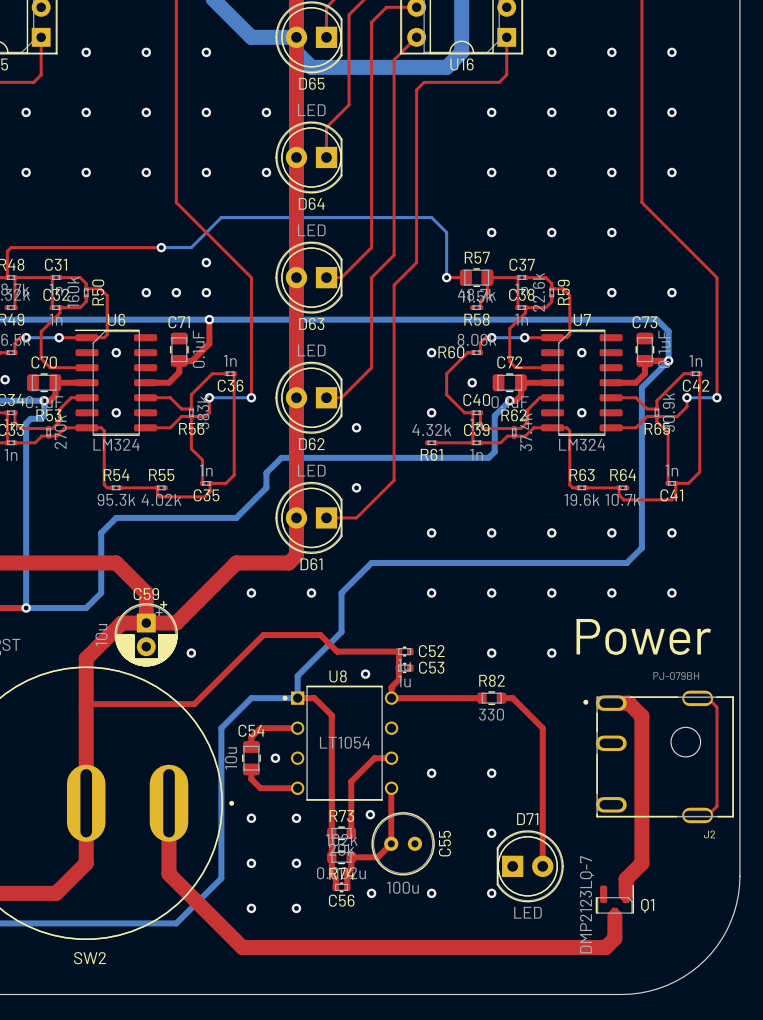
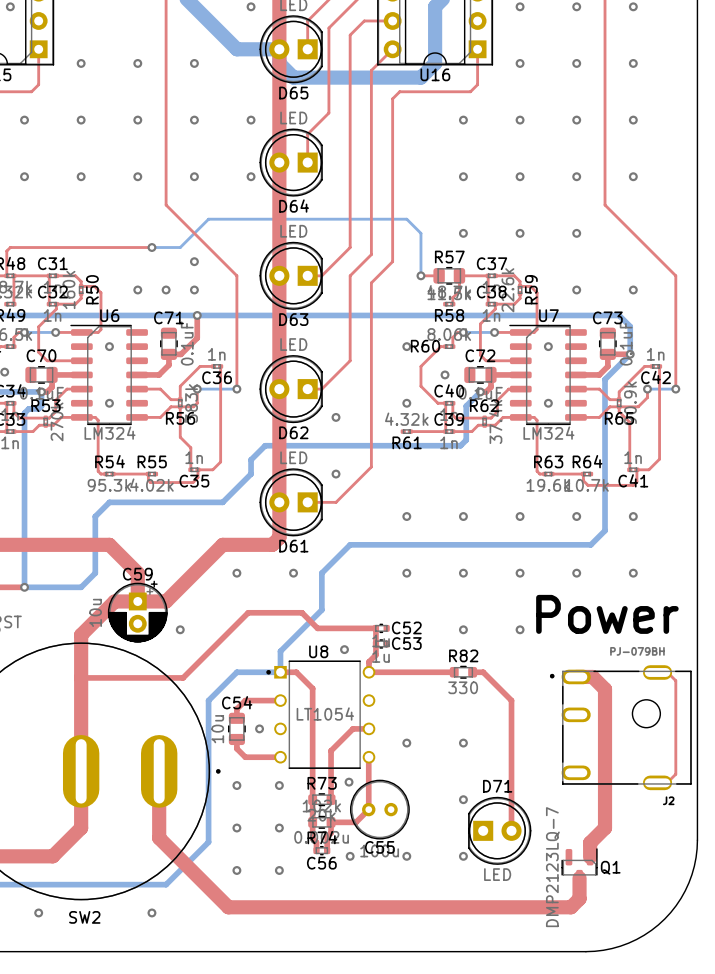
C55 name rotation: 0° (444, 843) -> 90° clockwise (379, 847)
C55 name position: C55 (444, 843) -> C55 (379, 847)
via: none -> (38, 912)
via: none -> (151, 912)

